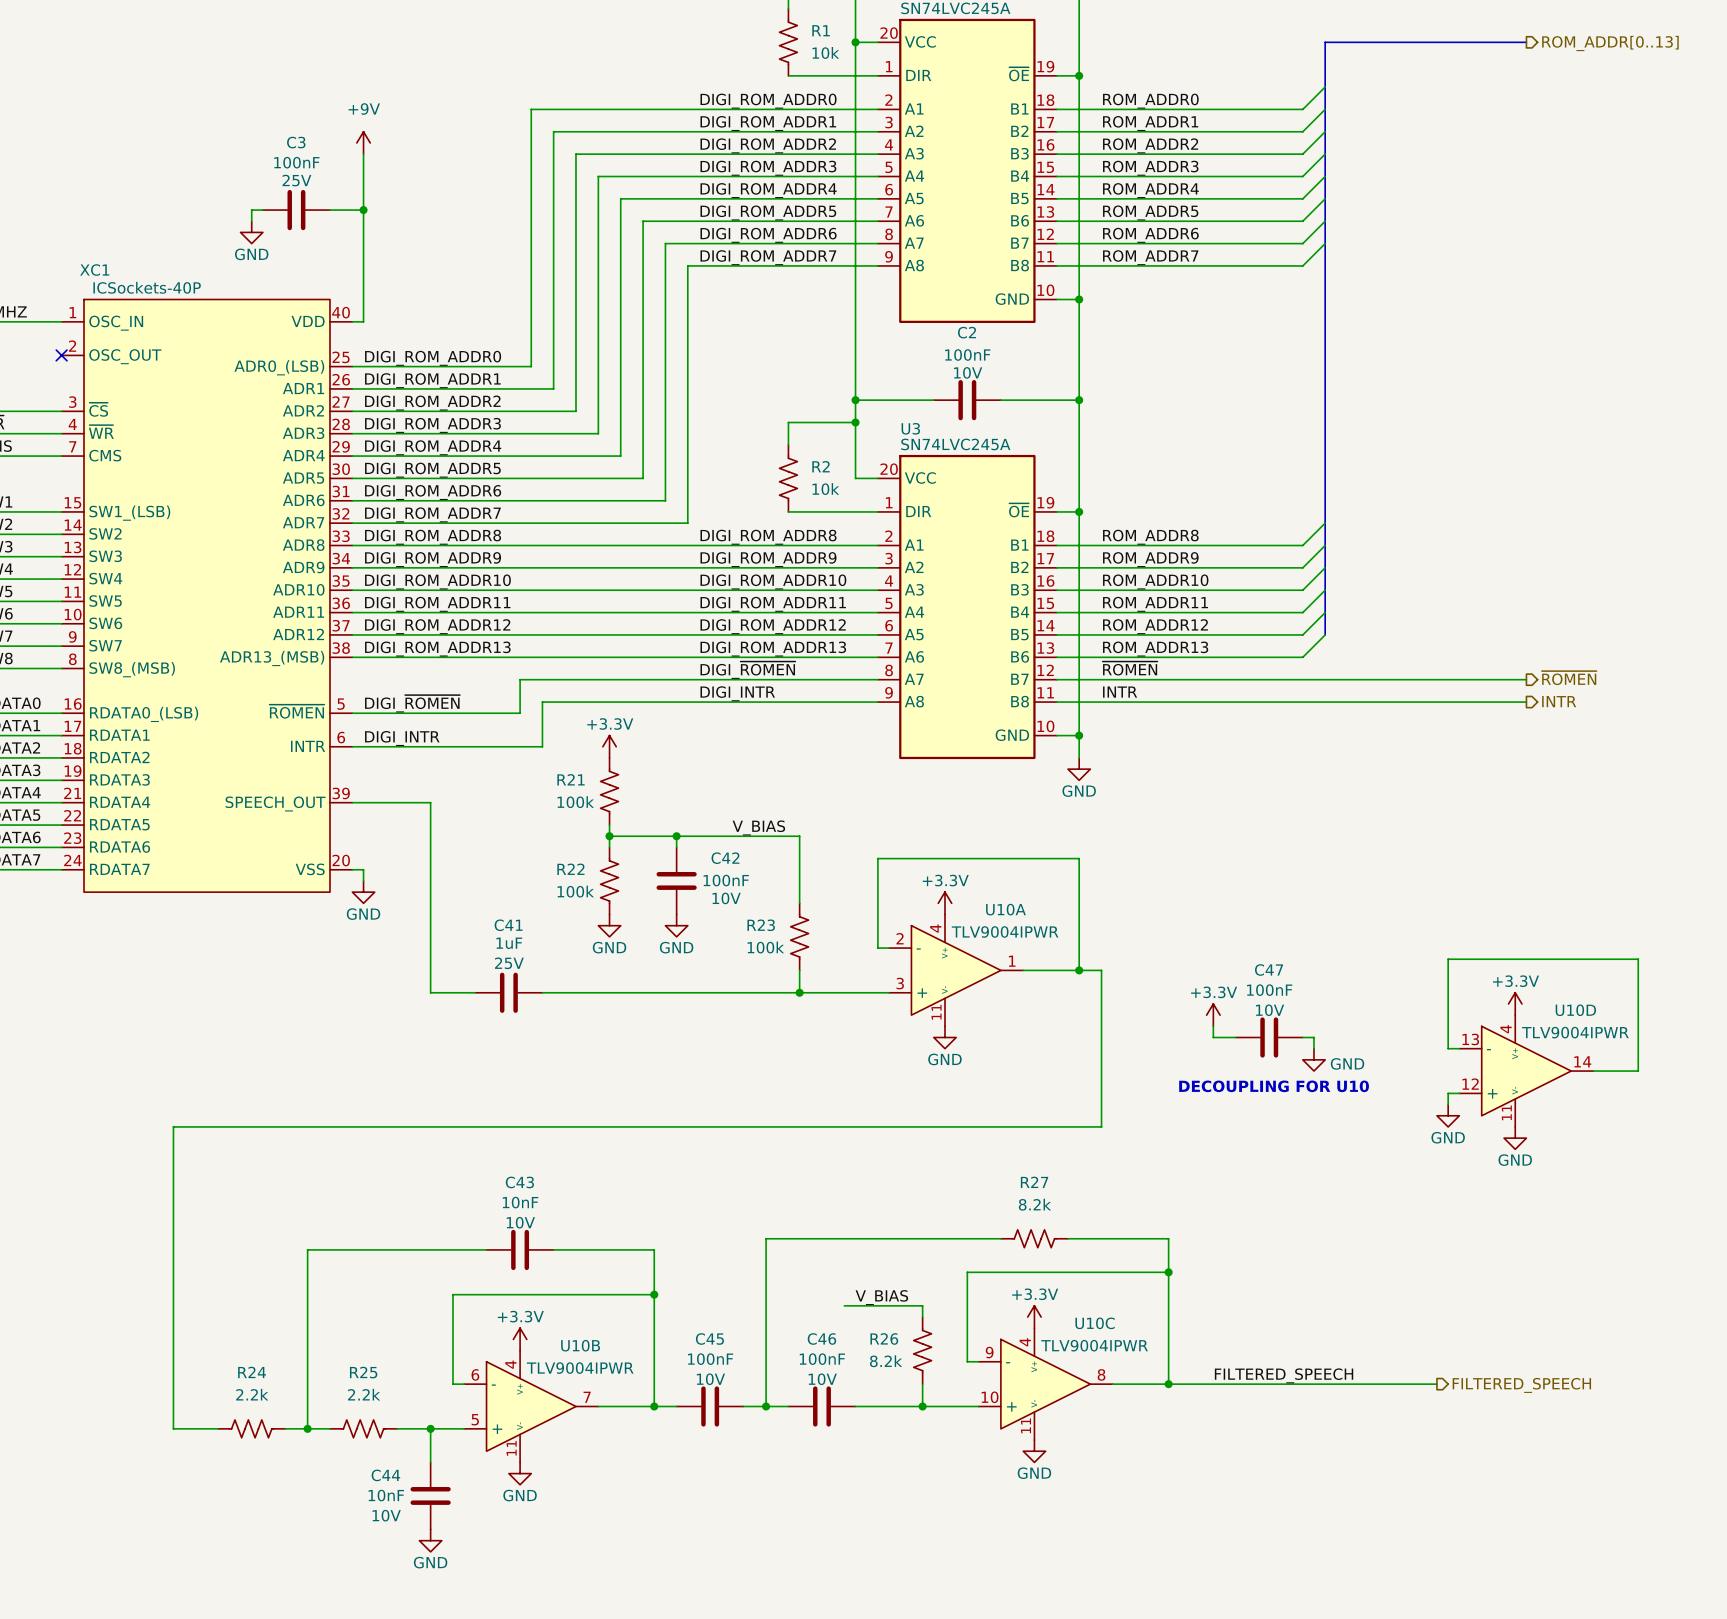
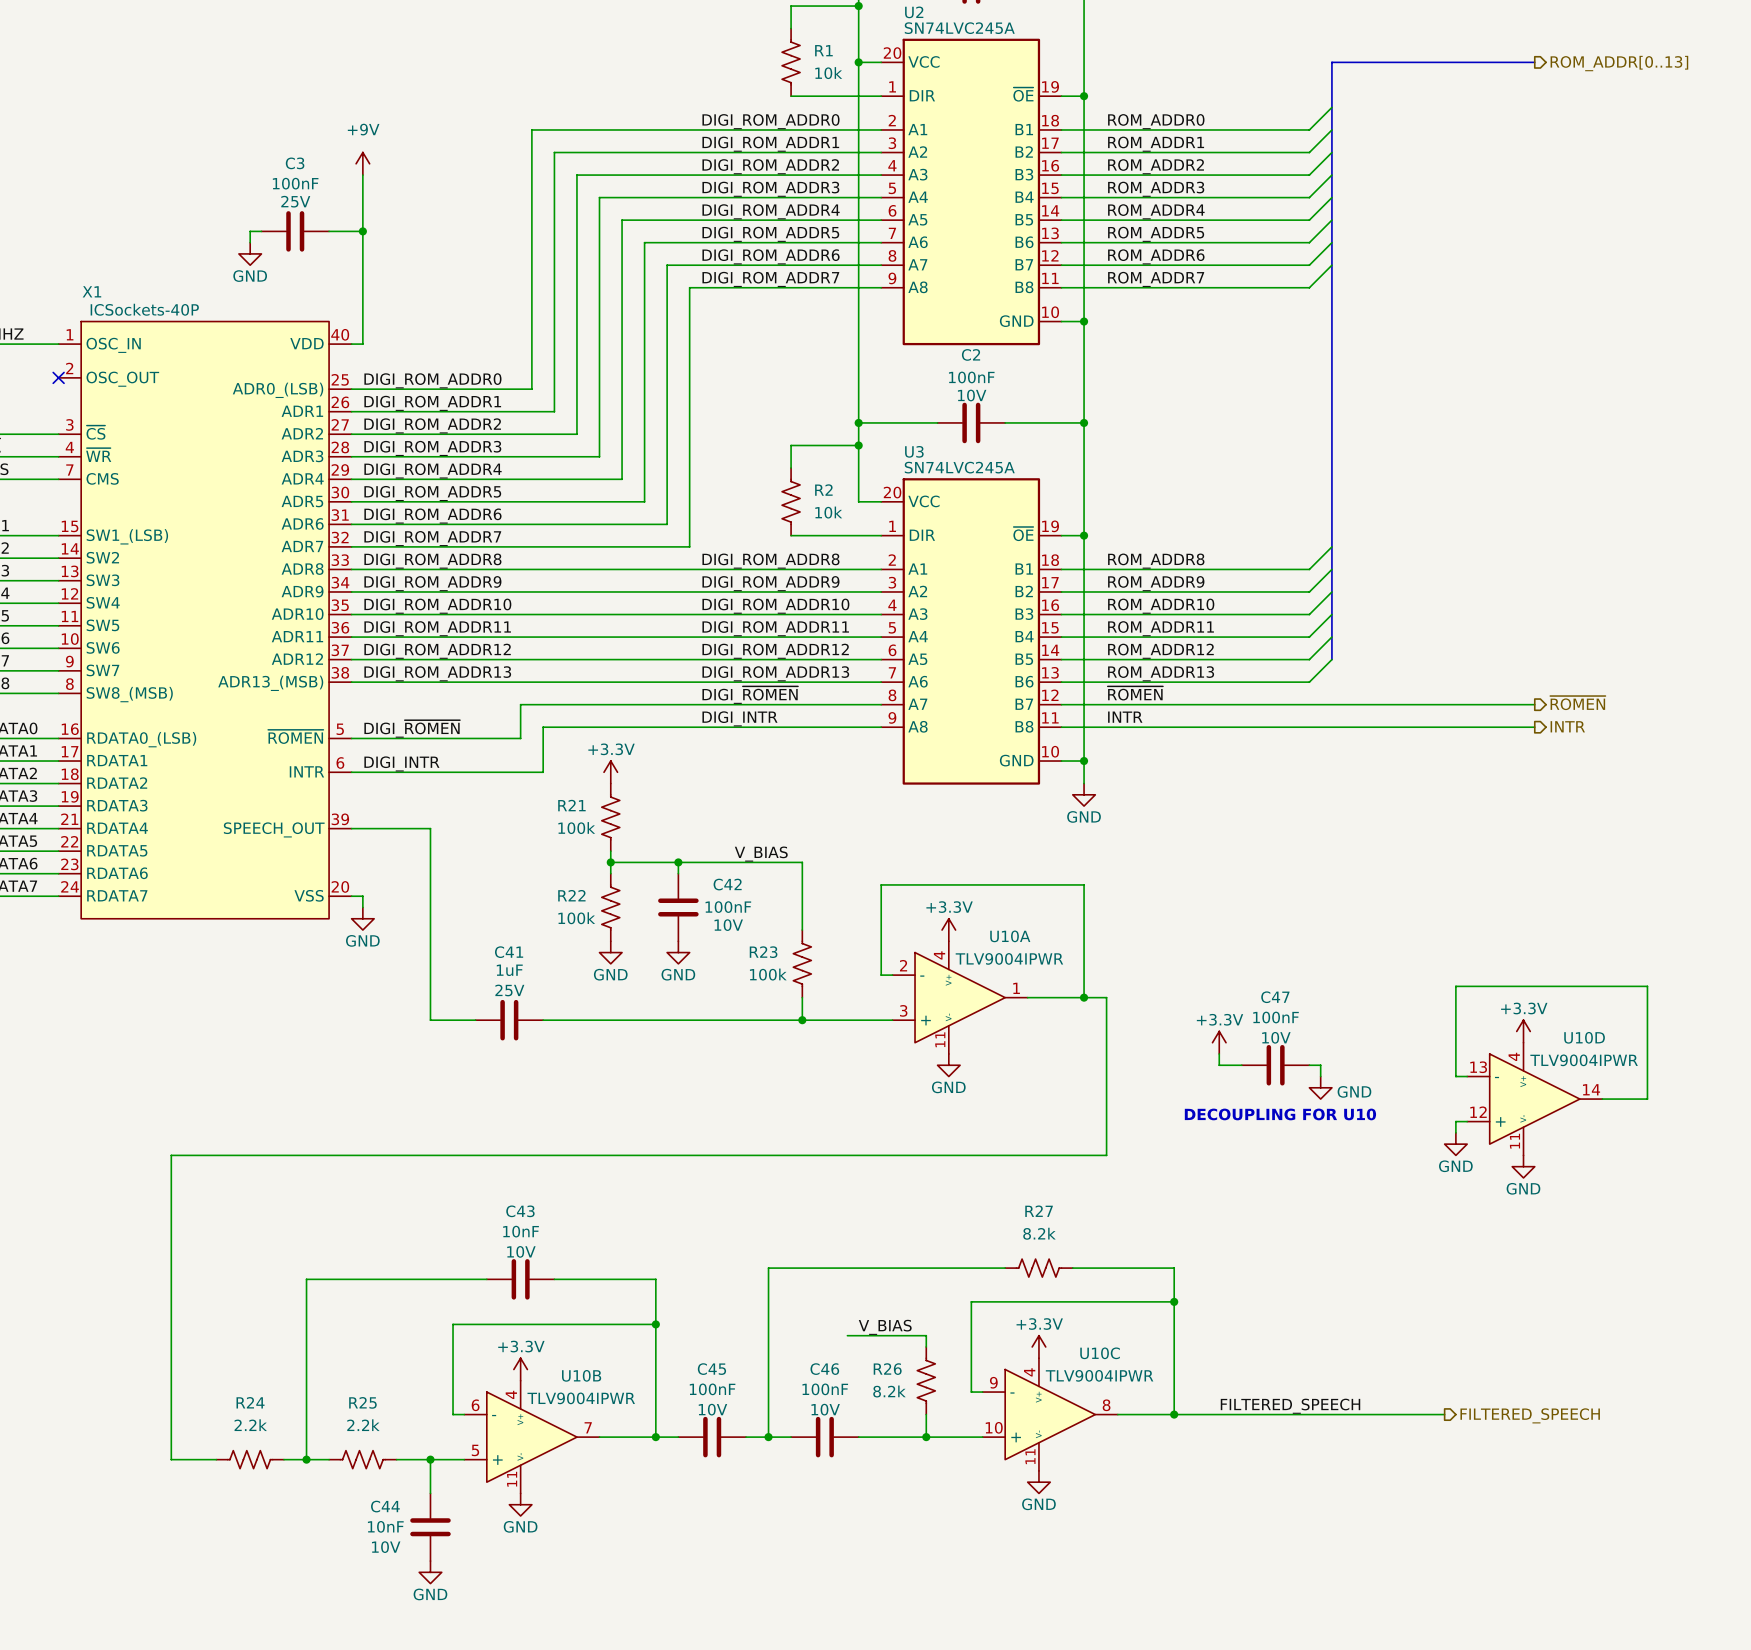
XC1 name: XC1 (94, 270) -> X1 (91, 291)

